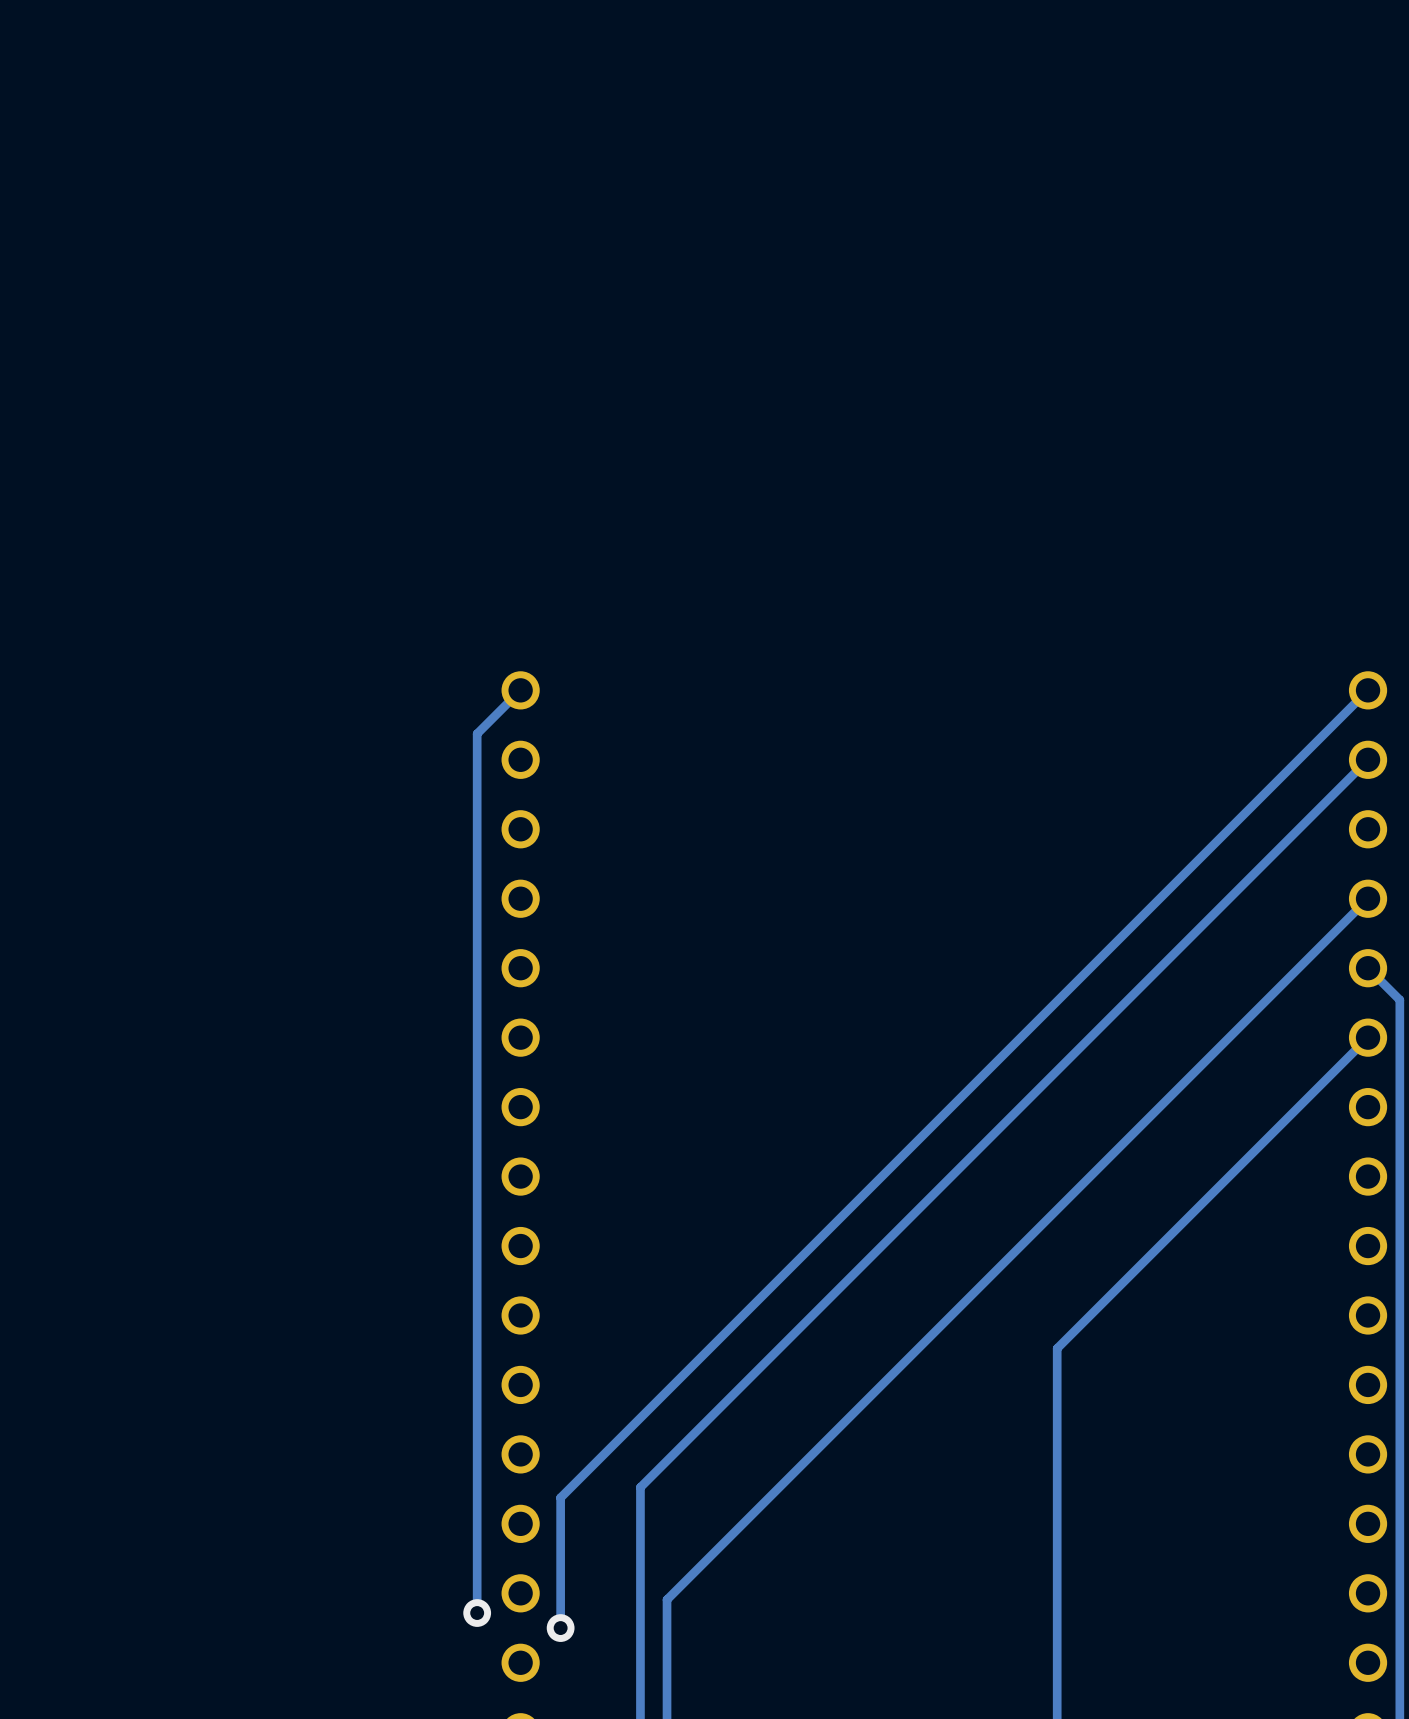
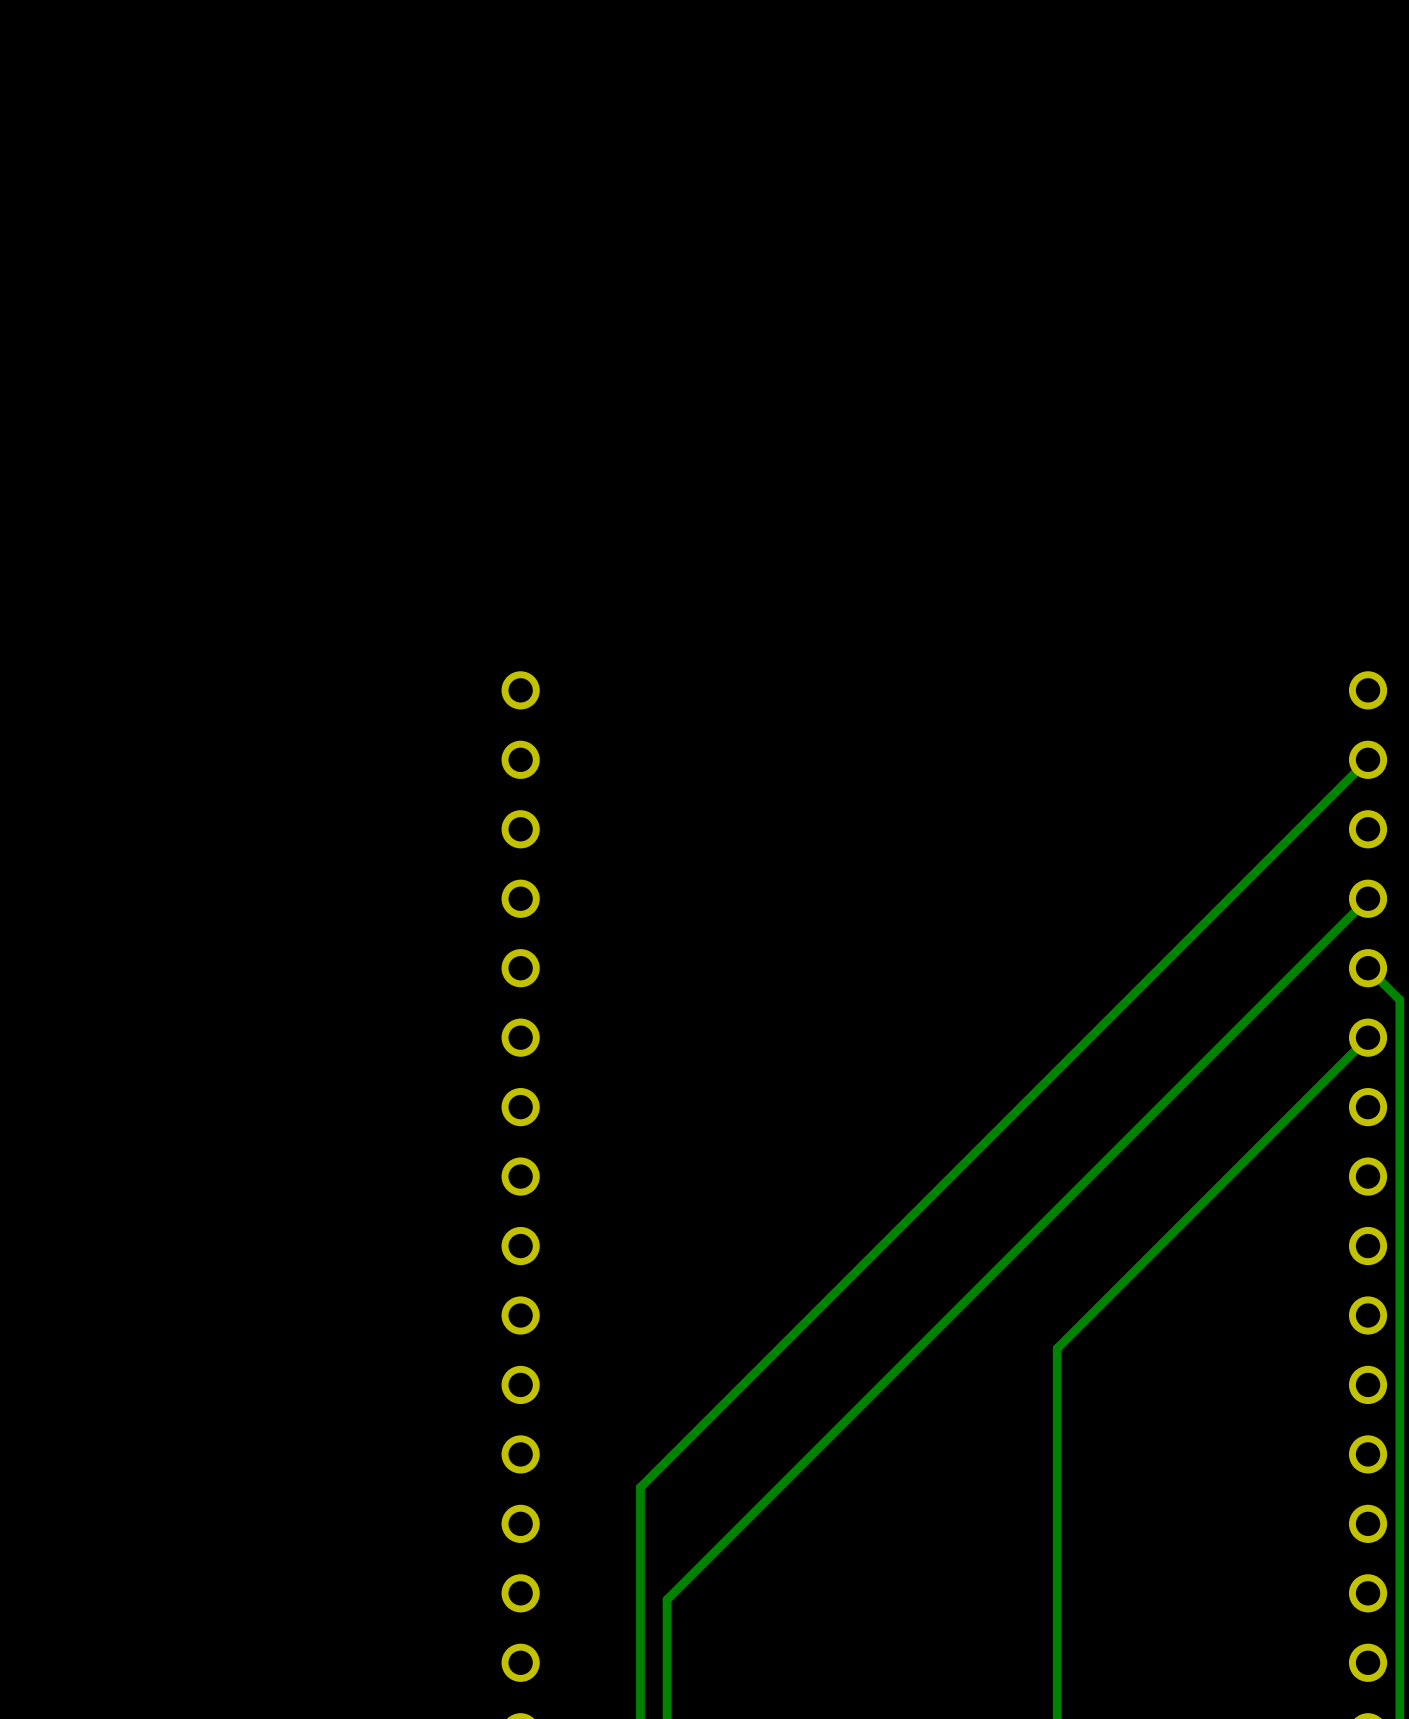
track: (520, 690) (477, 733) (477, 1613) -> none
track: (1368, 690) (560, 1497) (560, 1628) -> none
via: (477, 1613) -> none
via: (560, 1628) -> none

